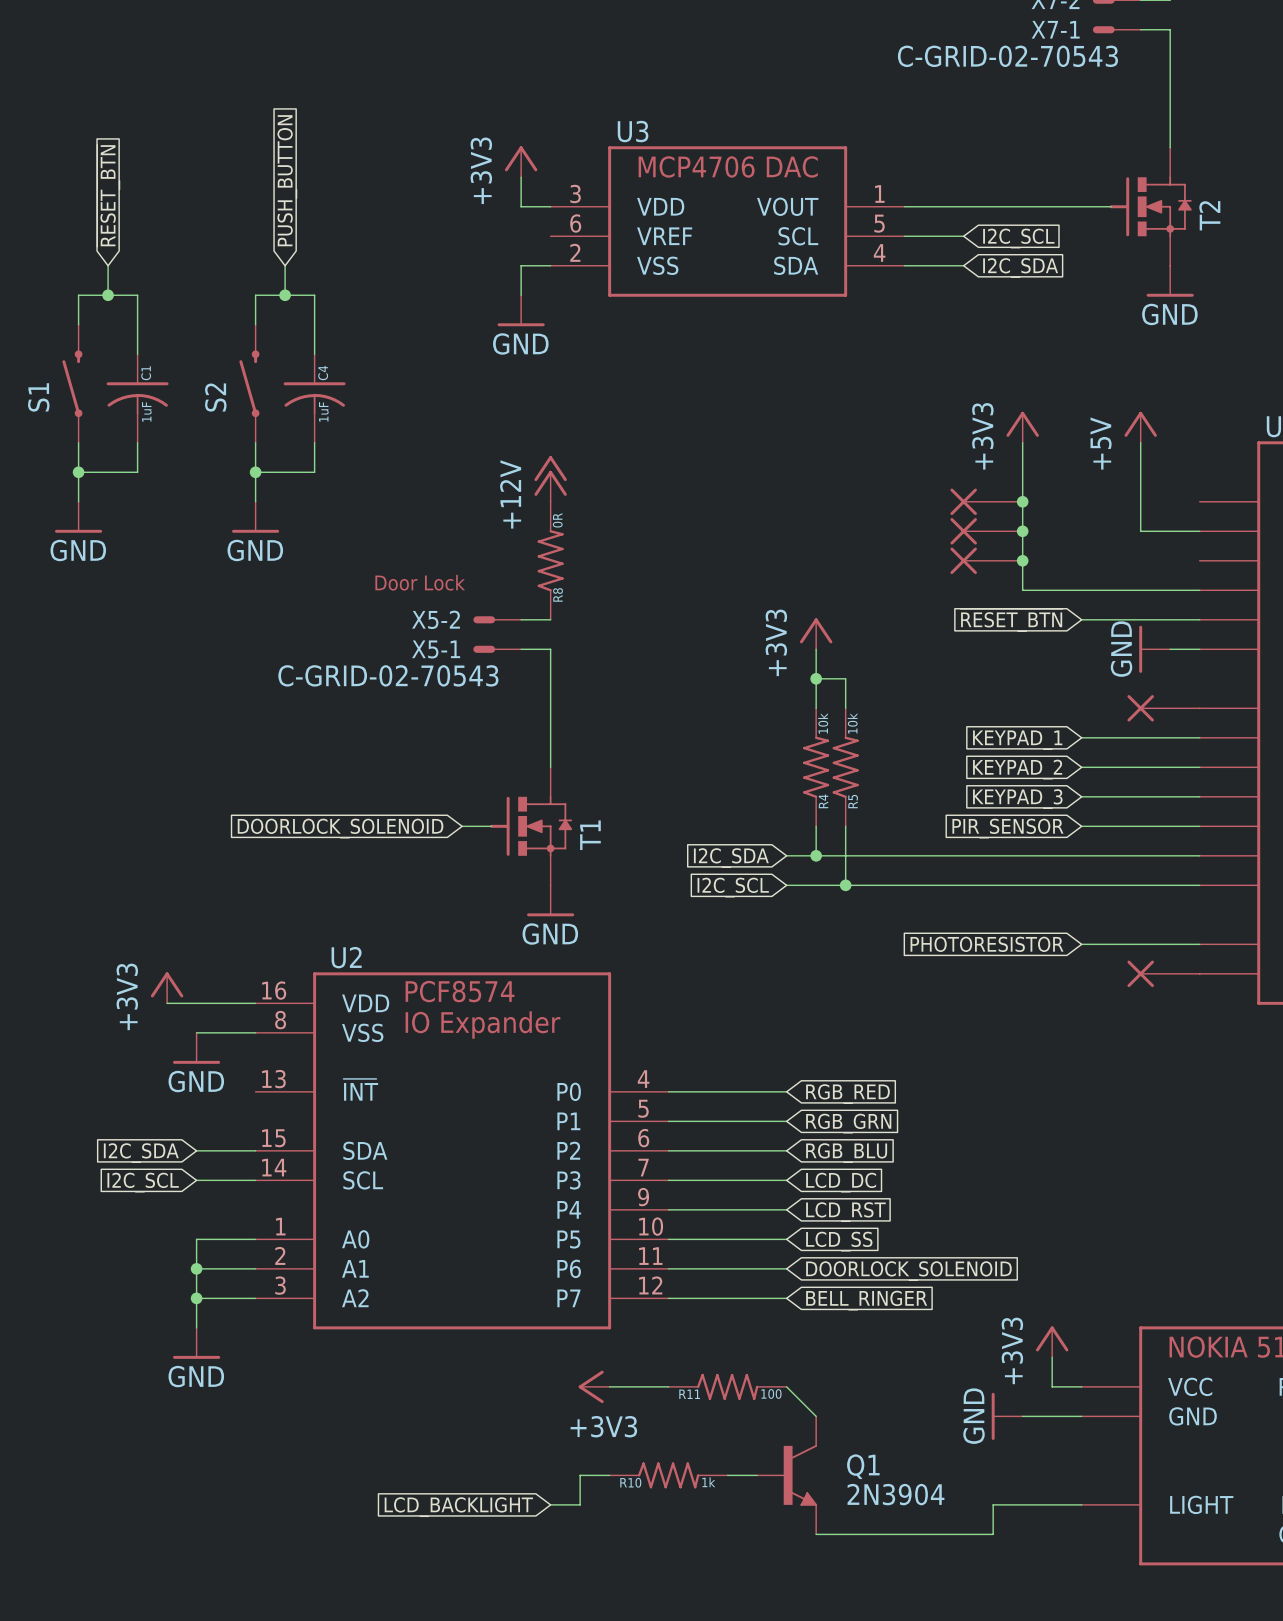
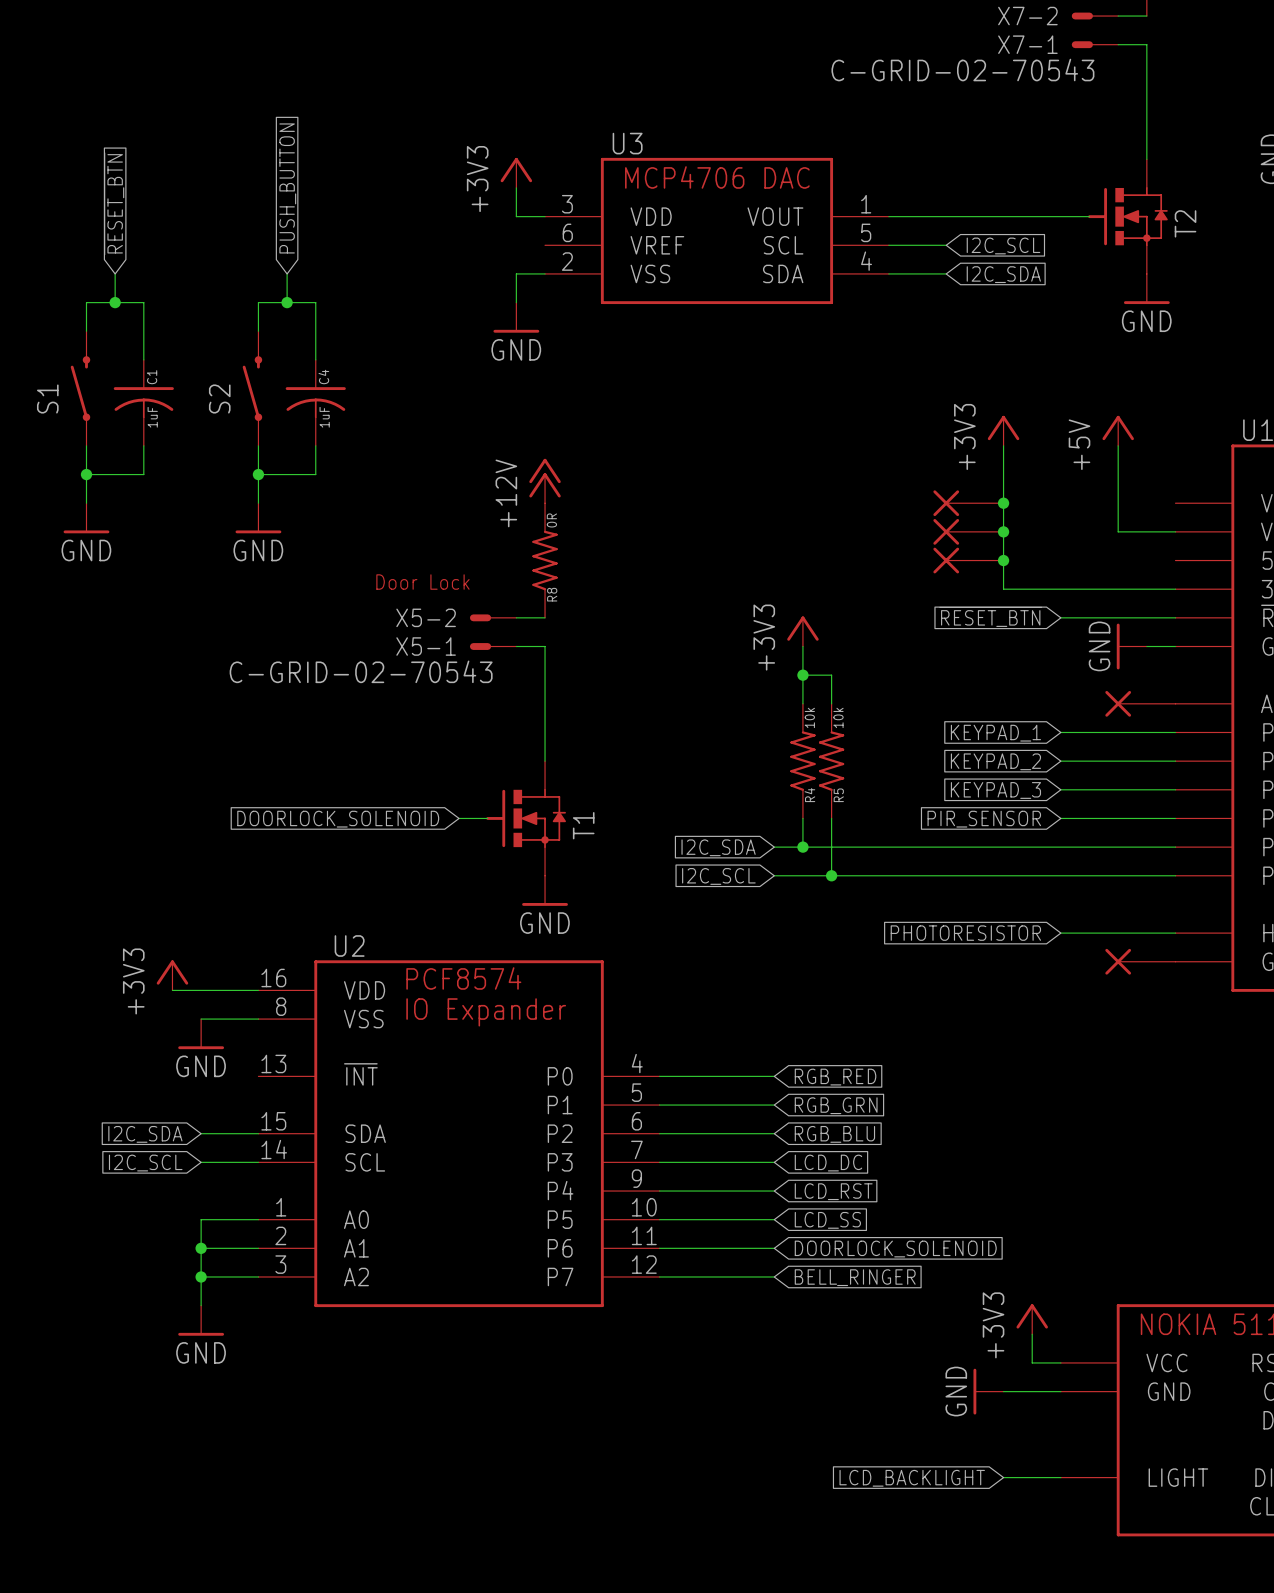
power symbol: +3V3 (594, 1386) -> none
wire: (609, 1386) (668, 1386) -> none
R11: 100 (727, 1386) -> none
wire: (786, 1386) (816, 1416) -> none
wire: (609, 1475) (580, 1475) (580, 1504) (550, 1504) -> none
R10: 1k (668, 1475) -> none
wire: (727, 1475) (757, 1475) -> none
Q1: 2N3904 (787, 1475) -> none
wire: (1022, 1504) (993, 1504) (993, 1534) (816, 1534) -> none
global label: LCD_BACKLIGHT (458, 1507) -> none
global label: none -> LCD_BACKLIGHT (912, 1478)

